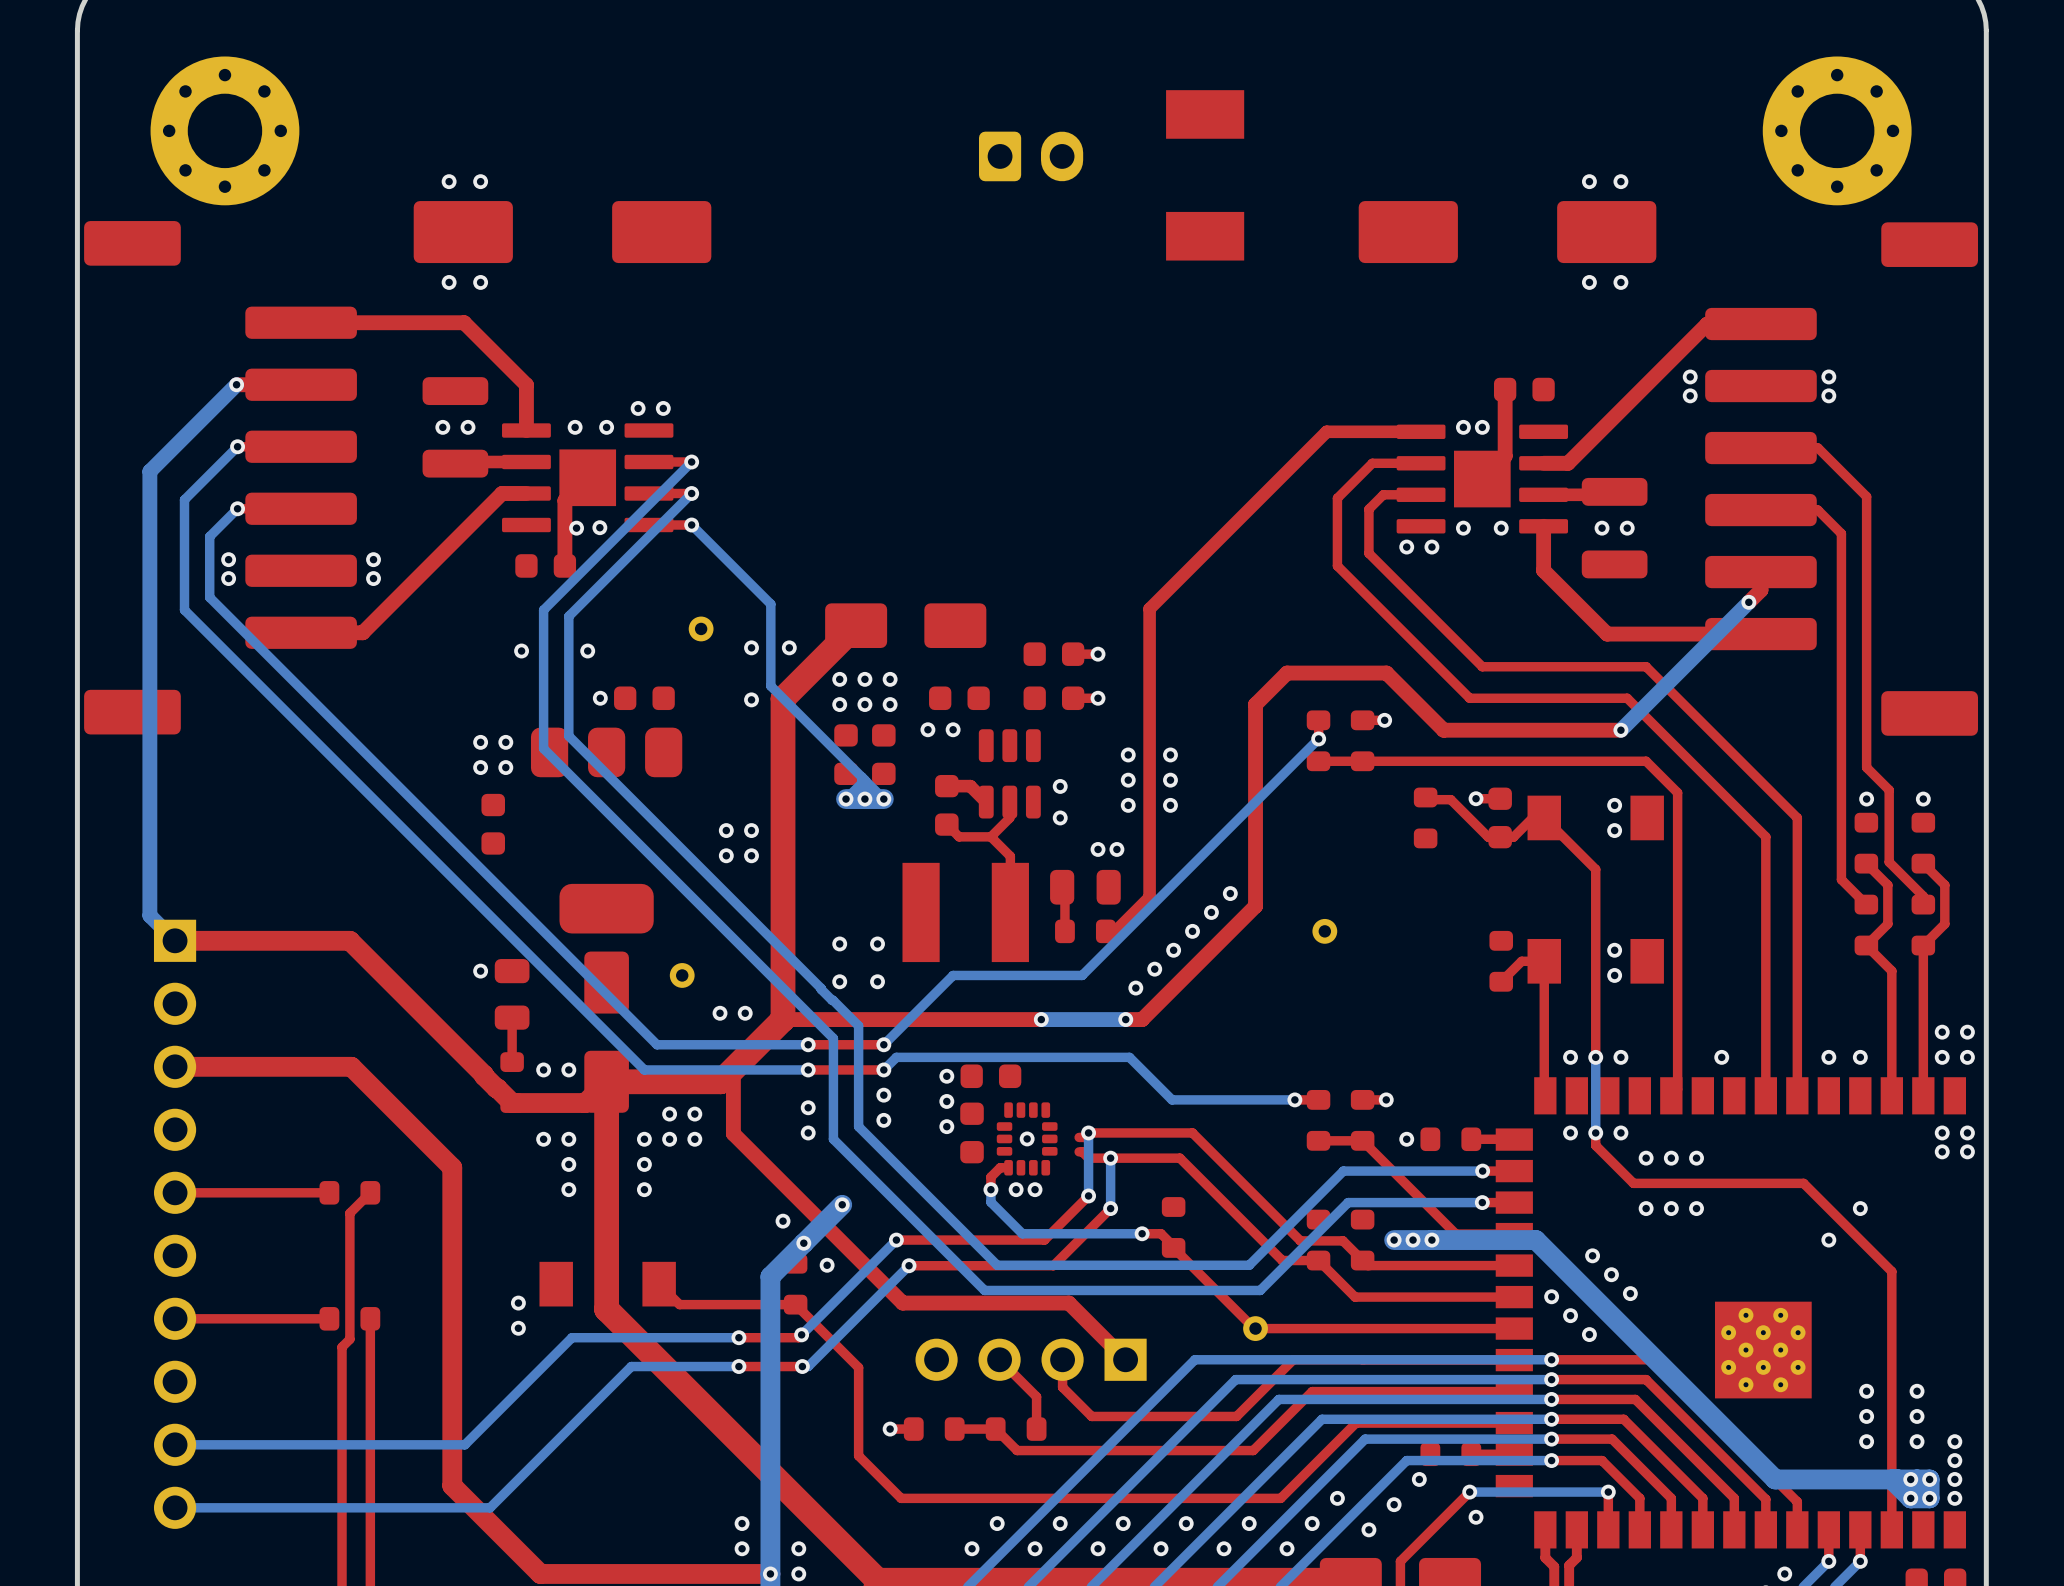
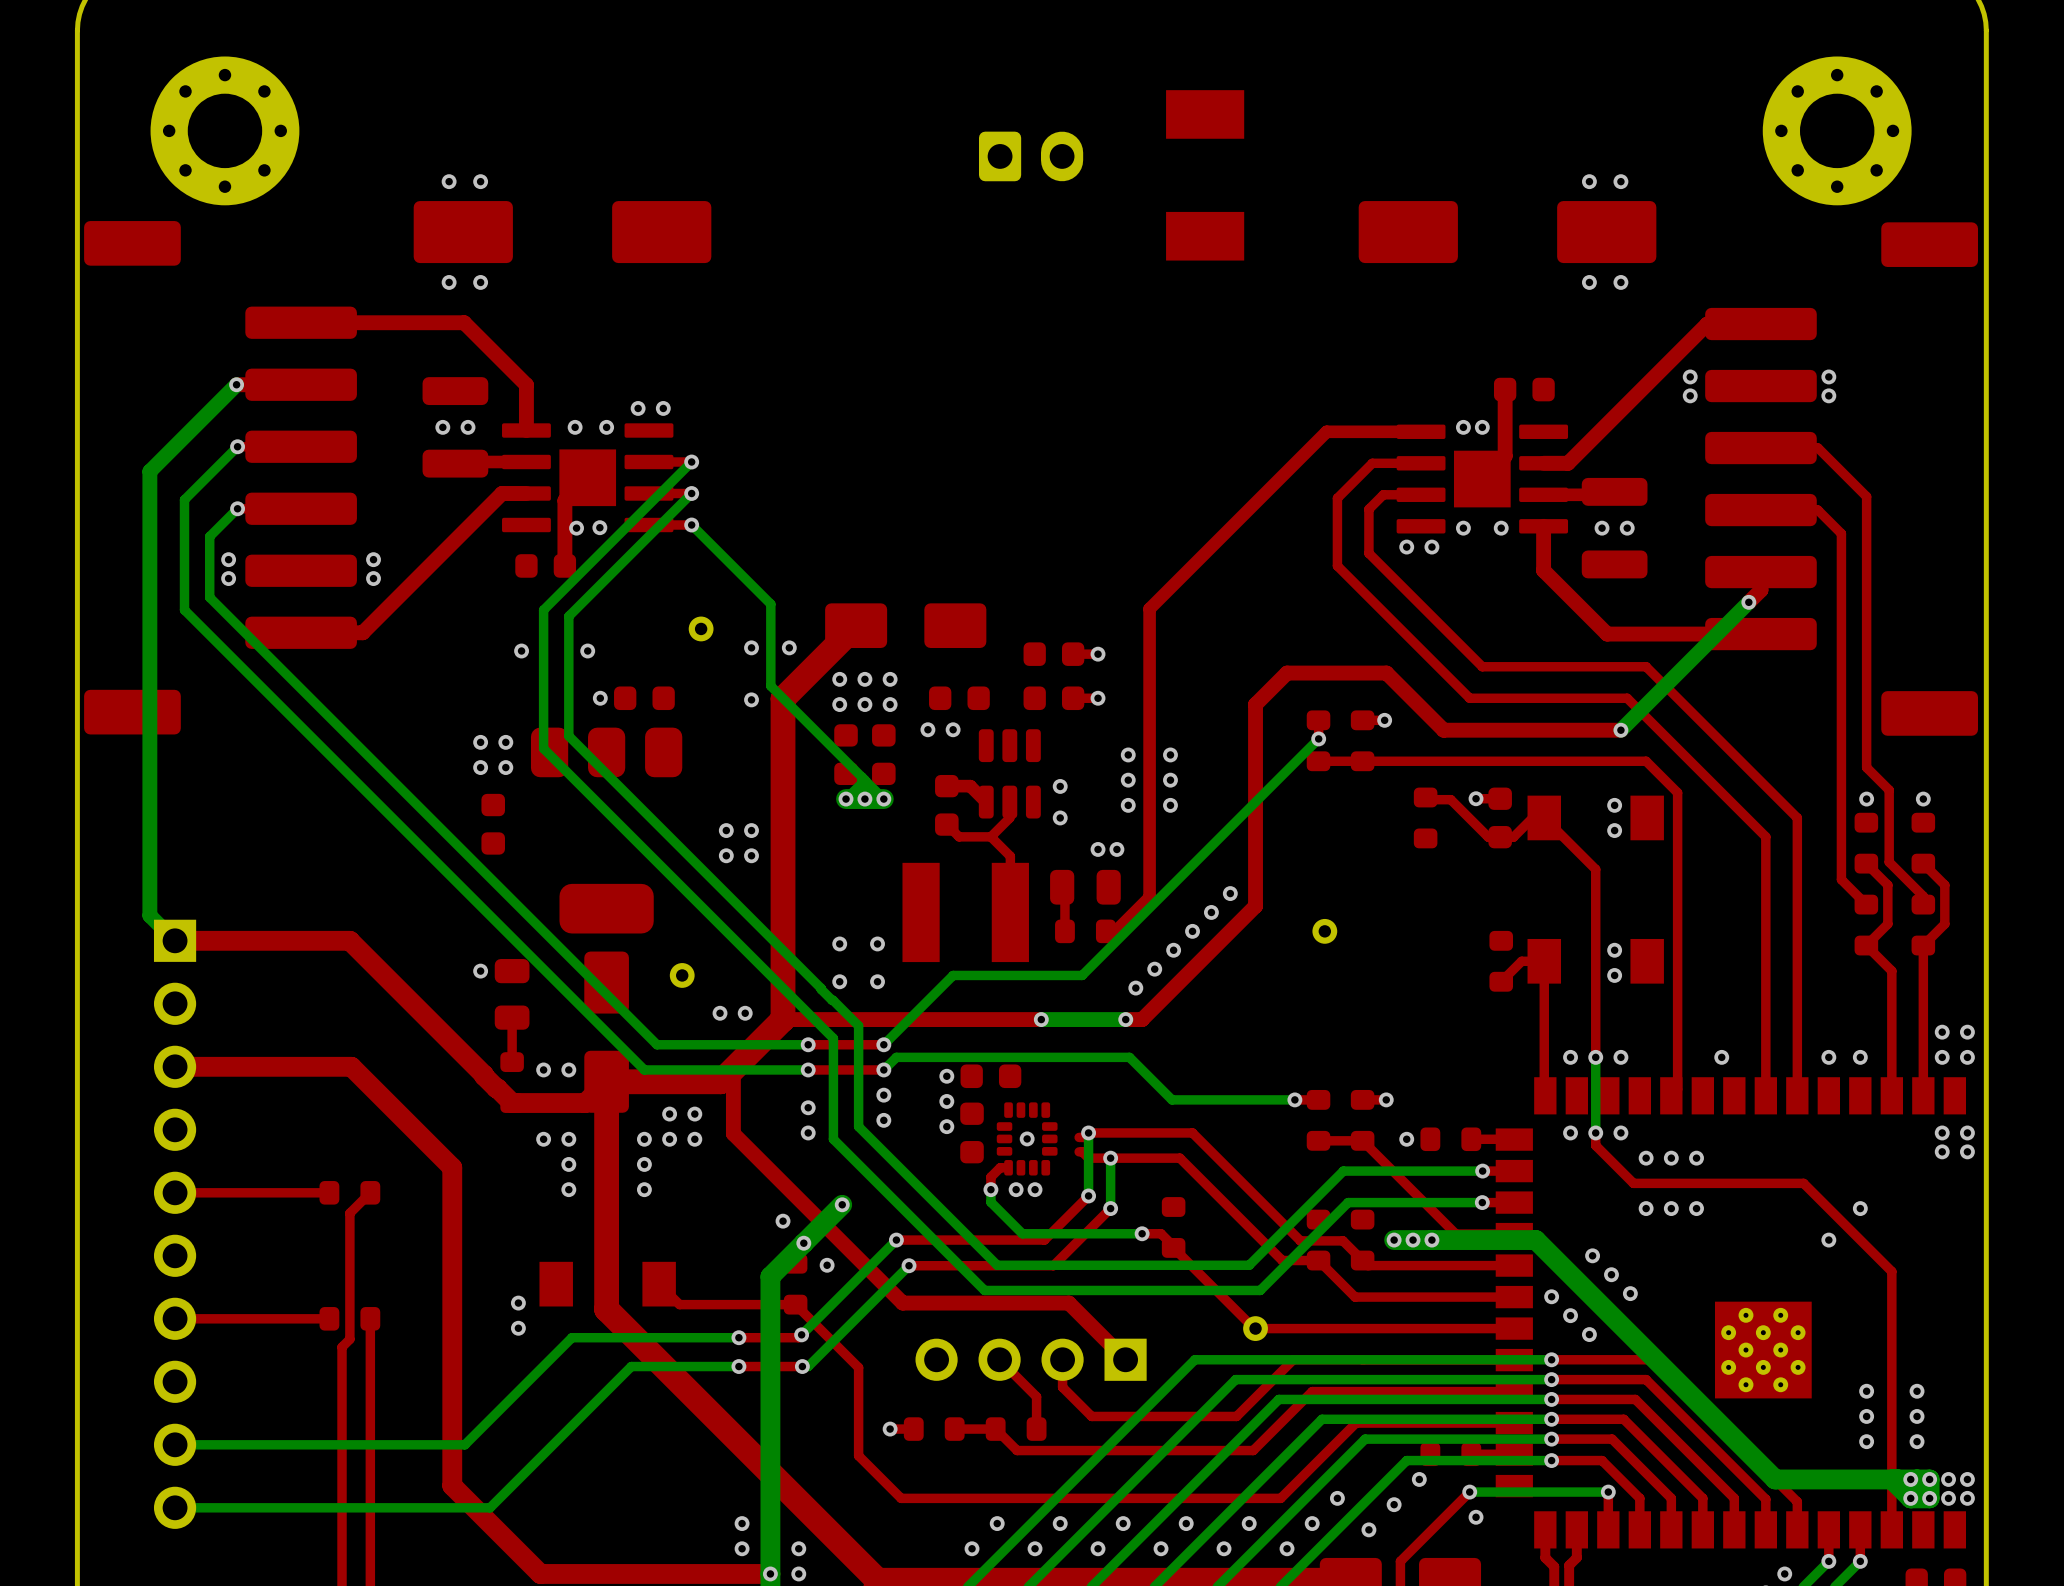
via: (1954, 1441) -> none
via: (1954, 1460) -> none
via: none -> (1948, 1479)
via: (1954, 1479) -> none
via: none -> (1967, 1479)
via: none -> (1948, 1498)
via: (1954, 1498) -> none
via: none -> (1967, 1498)

